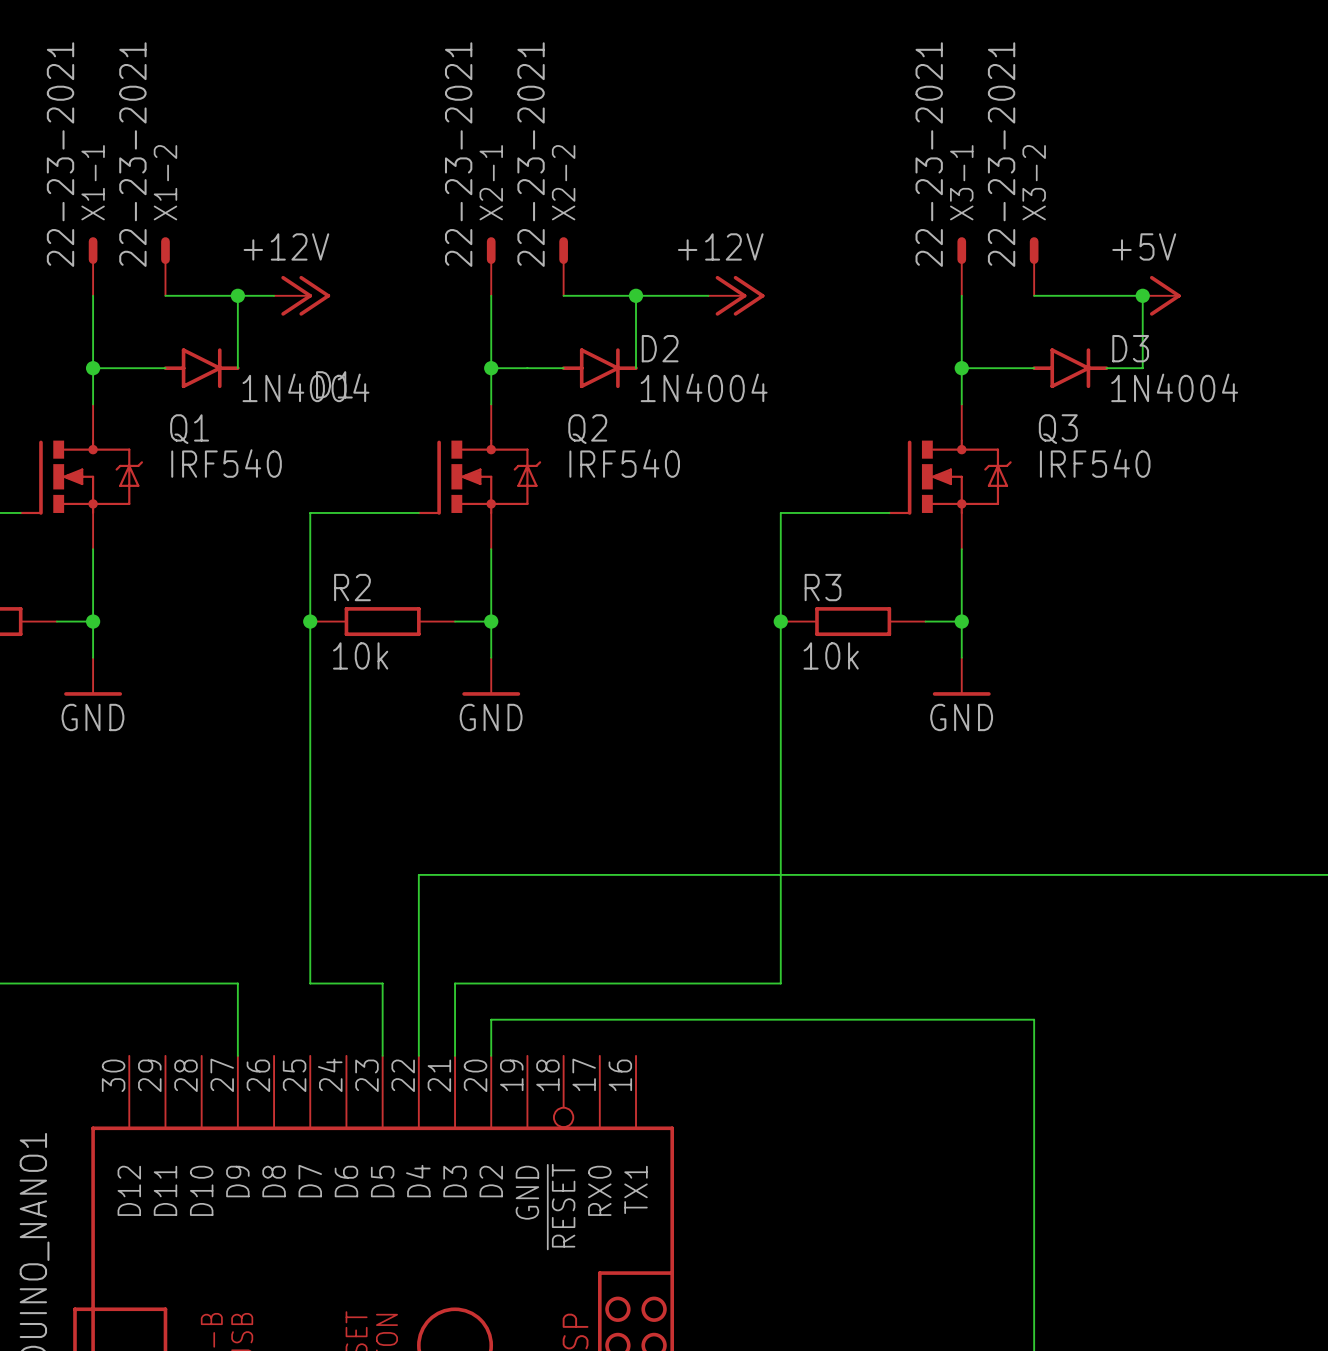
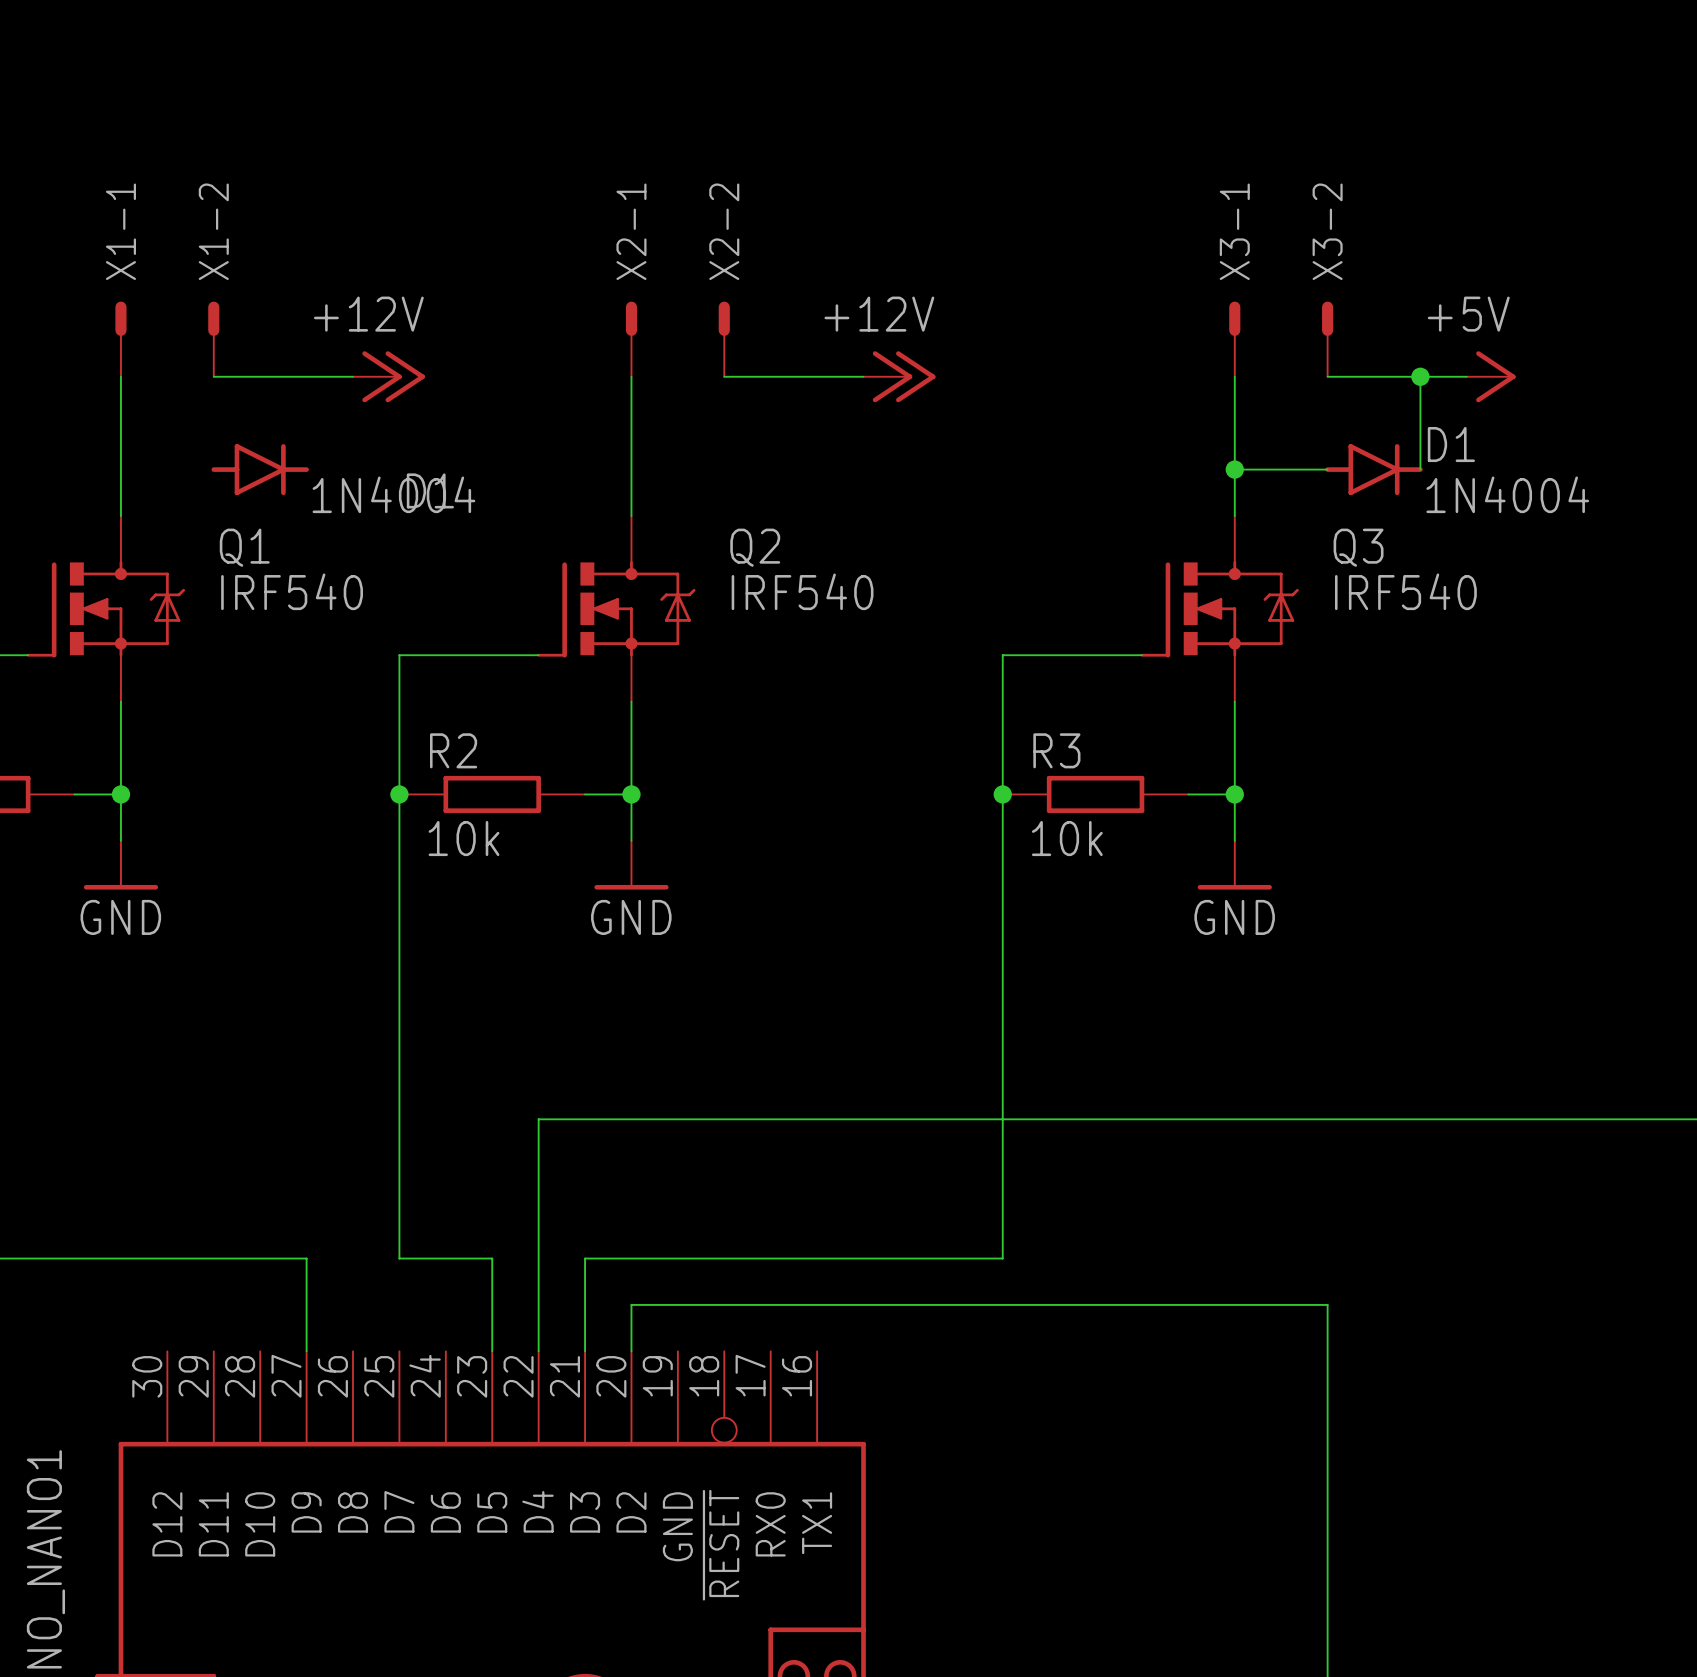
X1-1 value: 22-23-2021 (60, 154) -> none
X1-2 value: 22-23-2021 (132, 154) -> none
X2-1 value: 22-23-2021 (458, 154) -> none
X2-2 value: 22-23-2021 (531, 154) -> none
X3-1 value: 22-23-2021 (929, 154) -> none
X3-2 value: 22-23-2021 (1001, 154) -> none
wire: (237, 295) (237, 368) -> none
junction: (237, 295) -> none
wire: (636, 295) (636, 368) -> none
junction: (636, 295) -> none
power symbol position: +12V (736, 295) -> +12V (899, 376)
wire: (1142, 295) (1142, 368) (1106, 368) -> (1420, 376) (1420, 469)
junction position: (1142, 295) -> (1420, 376)
D3 name: D3 (1130, 348) -> D1 (1451, 444)
wire: (93, 368) (165, 368) -> none
junction: (93, 368) -> none
wire: (491, 368) (563, 368) -> none
junction: (491, 368) -> none
D2: 1N4004 (599, 368) -> none

